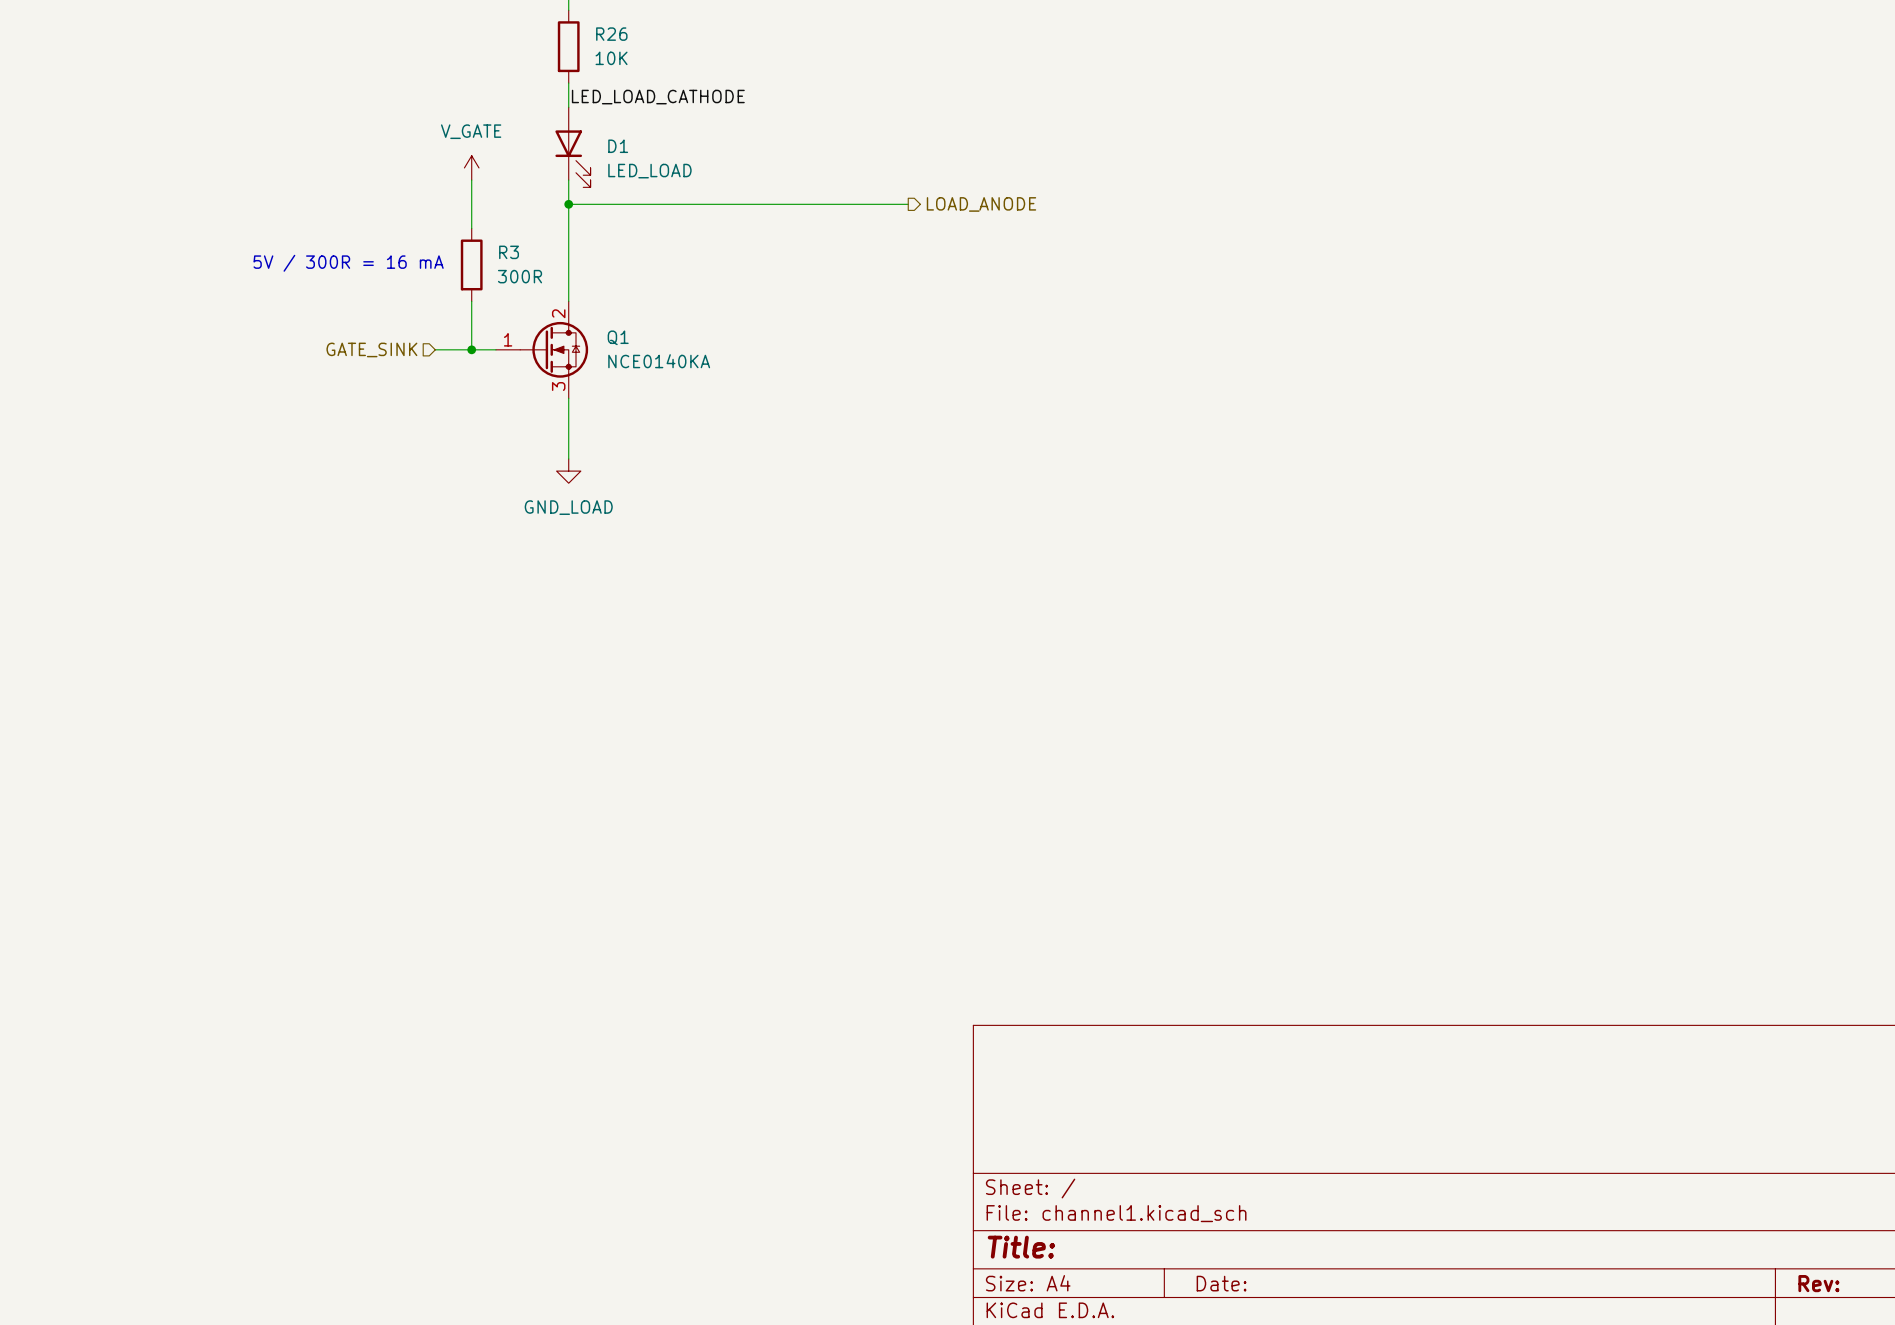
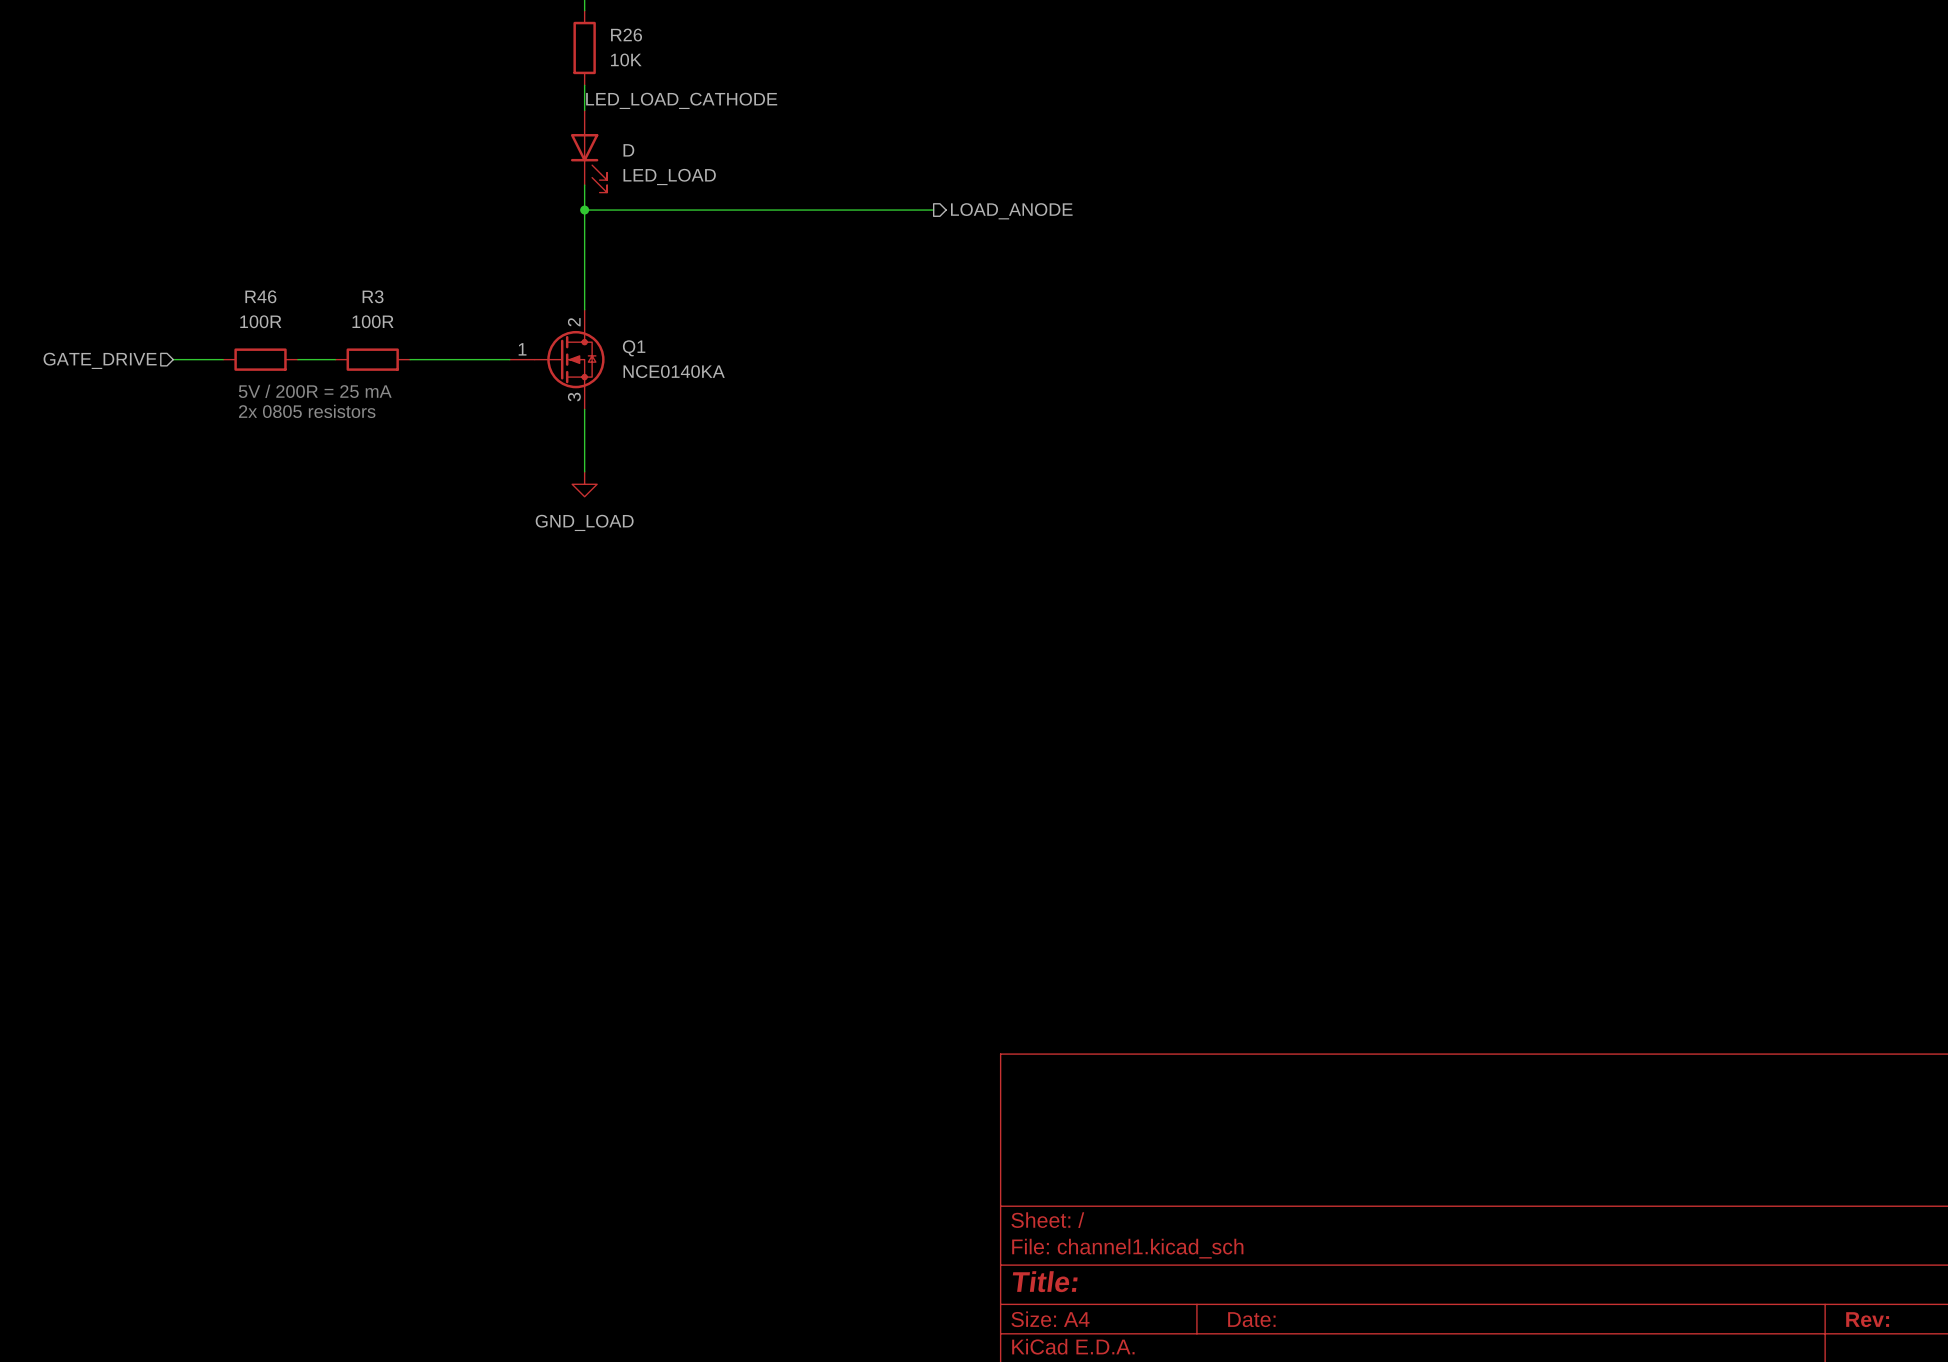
D1 name: D1 (618, 146) -> D (628, 150)
power symbol: V_GATE (471, 167) -> none
wire: (471, 180) (471, 228) -> none
R3 name position: R3 (509, 252) -> R3 (373, 296)
text: 5V / 300R = 16 mA (348, 263) -> none
R3 rotation: 0° (471, 264) -> 90° clockwise (372, 359)
R3 position: (471, 264) -> (372, 359)
R3 value: 300R (520, 276) -> 100R (372, 321)
wire: (471, 301) (471, 349) -> none
hierarchical label: none -> GATE_DRIVE (100, 360)
wire: none -> (173, 359) (223, 359)
R46: none -> 100R (260, 359)
wire: none -> (297, 359) (335, 359)
hierarchical label: GATE_SINK (371, 349) -> none
wire: none -> (410, 359) (447, 359)
junction: (471, 349) -> none
text: none -> 5V / 200R = 25 mA (315, 391)
text: none -> 2x 0805 resistors (307, 411)

